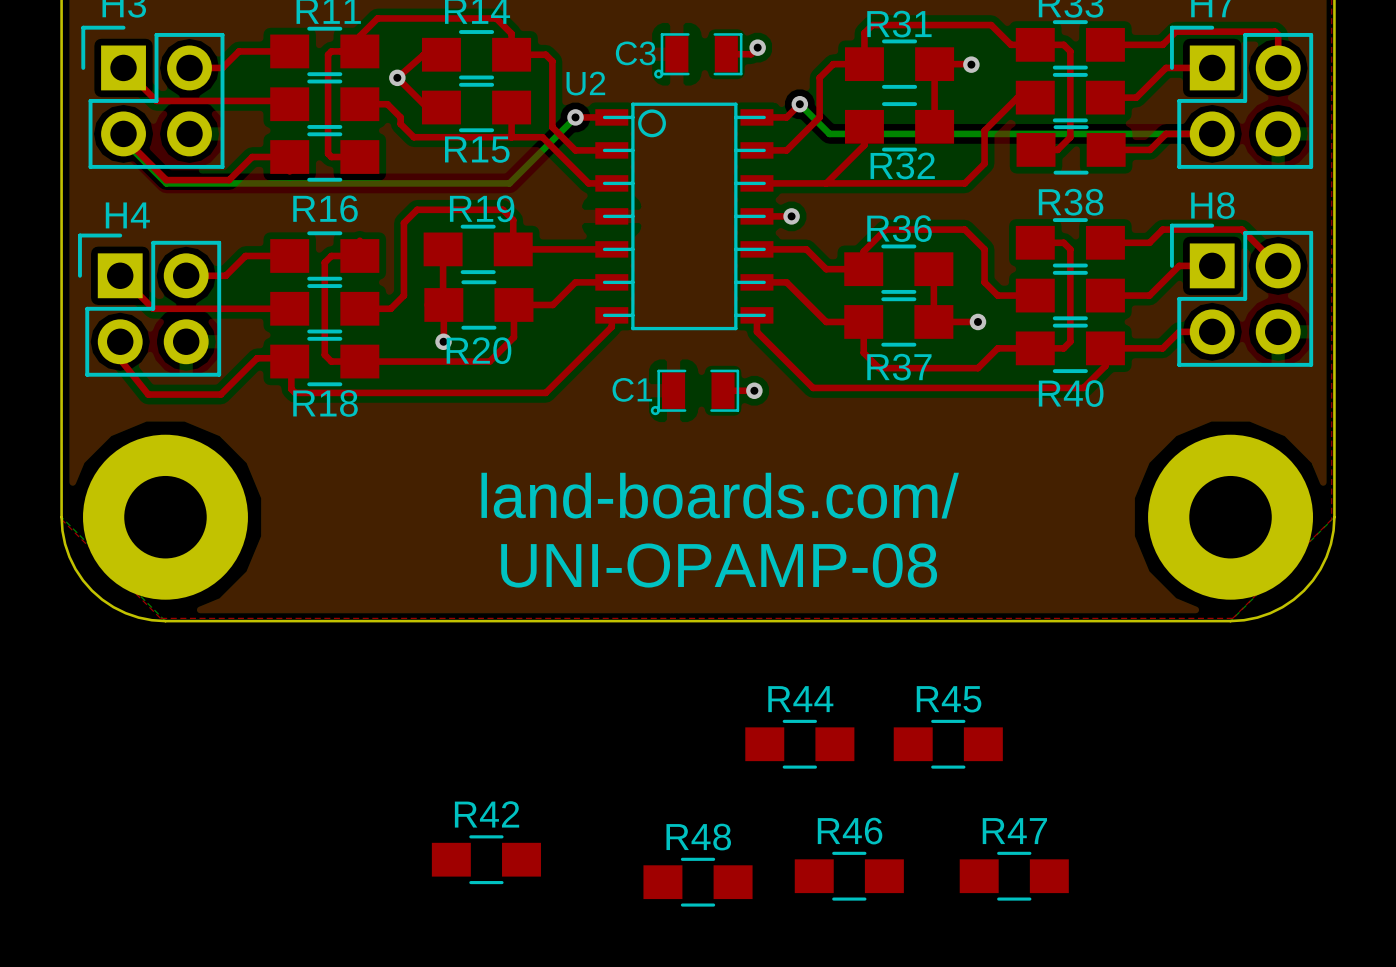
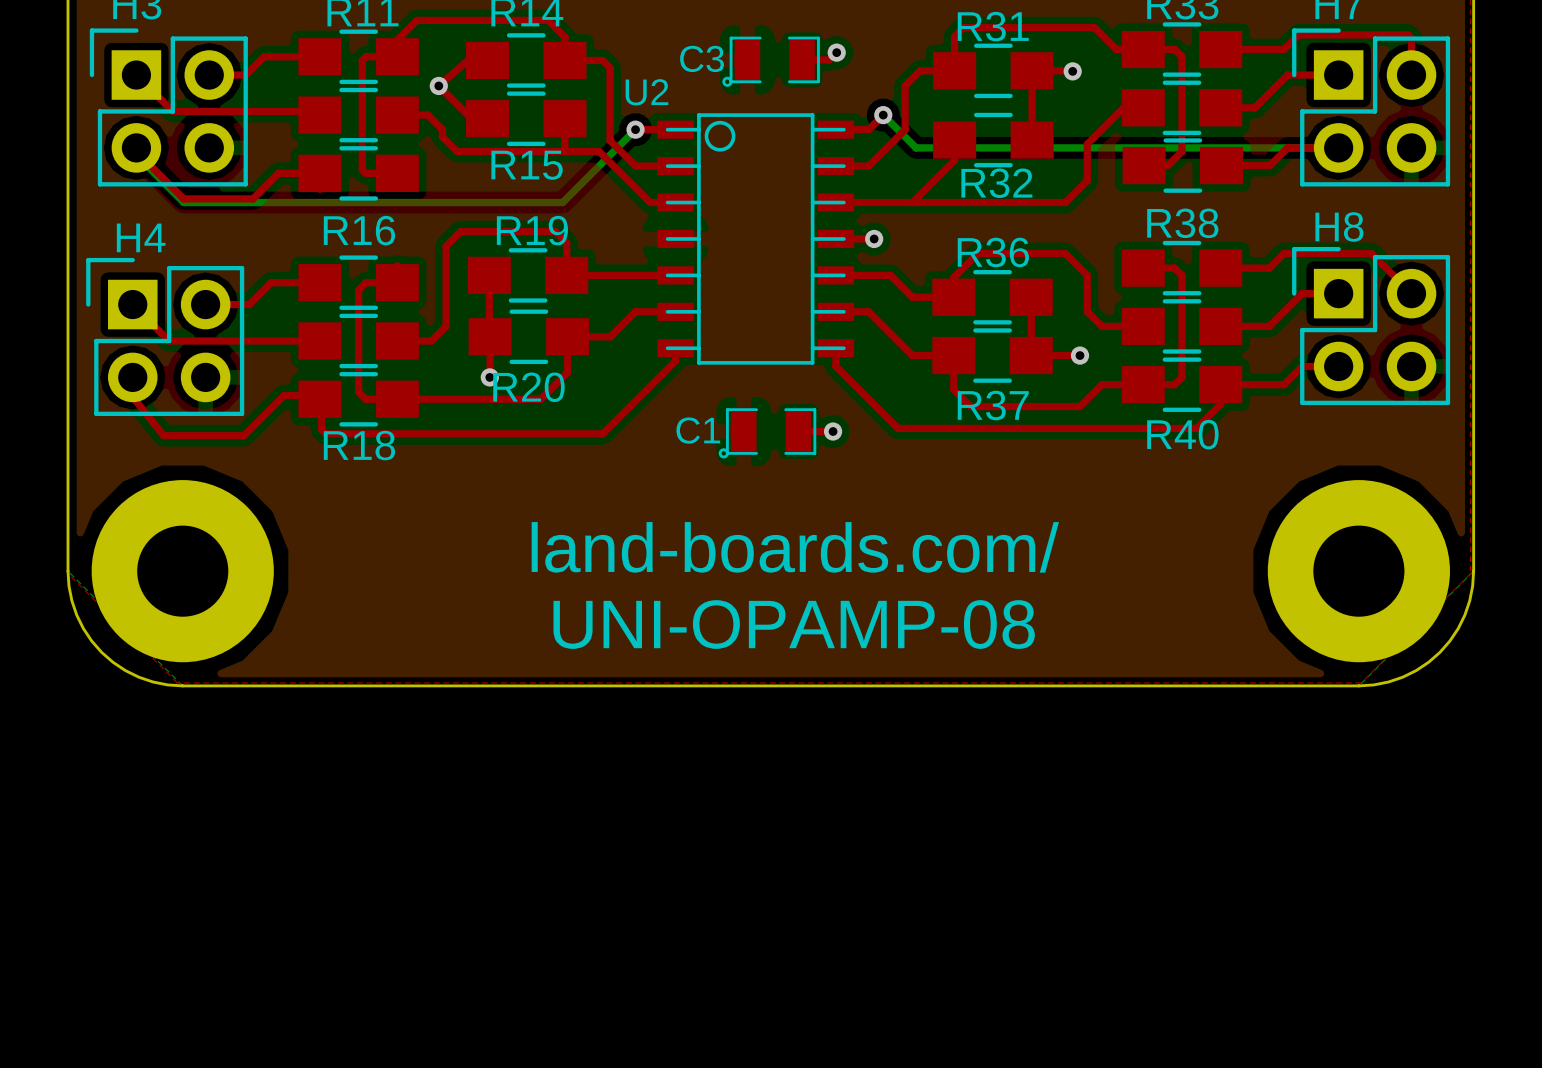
R44: (799, 744) -> none
R45: (948, 744) -> none
R42: (486, 859) -> none
R46: (849, 876) -> none
R47: (1014, 876) -> none
R48: (698, 882) -> none

